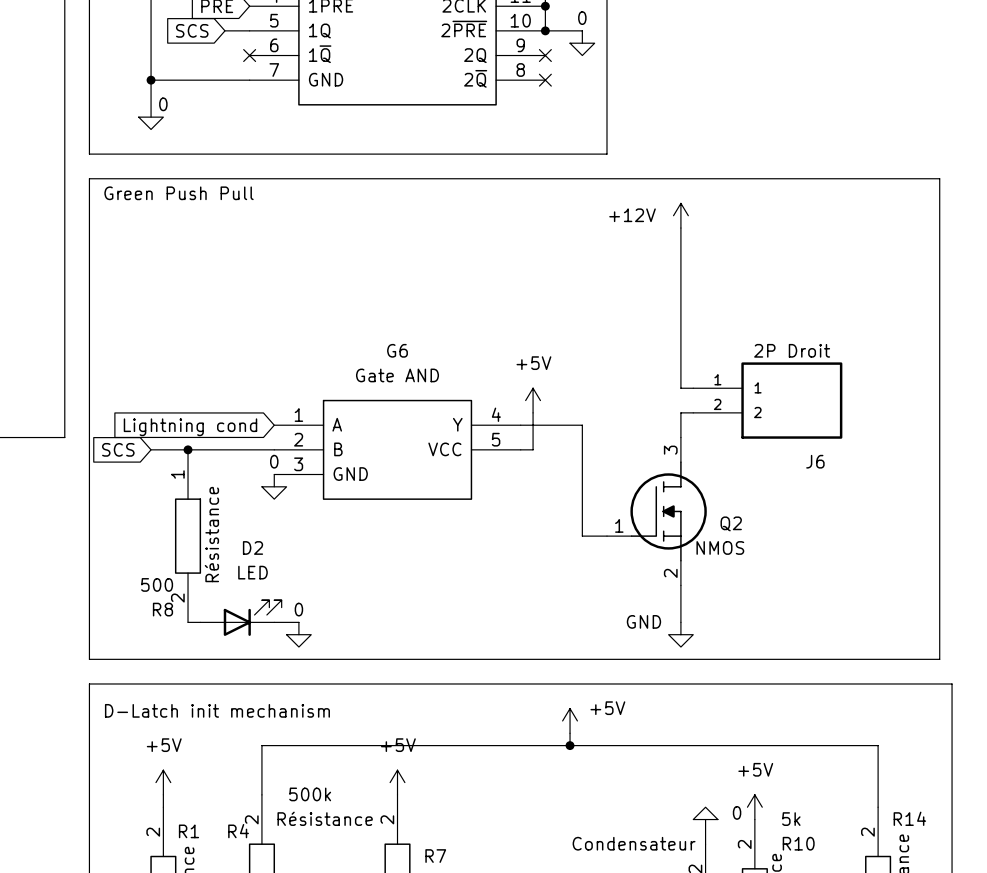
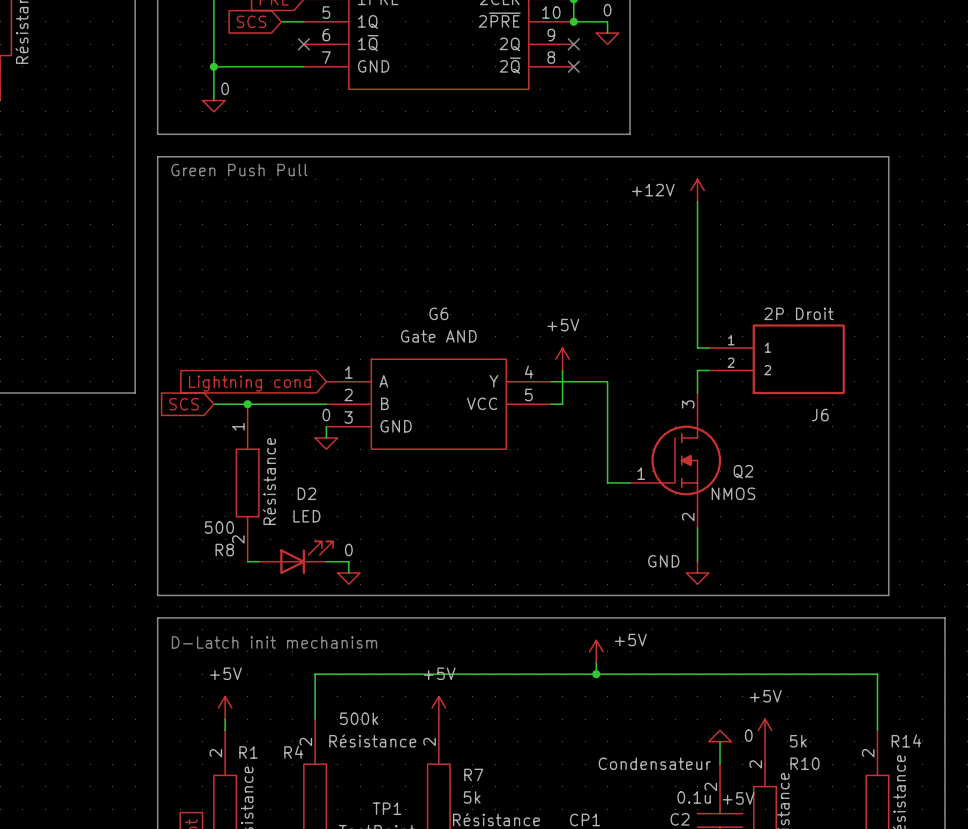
line: (890, 178) (939, 178) (939, 659) (890, 659) -> (888, 156) (888, 595)

